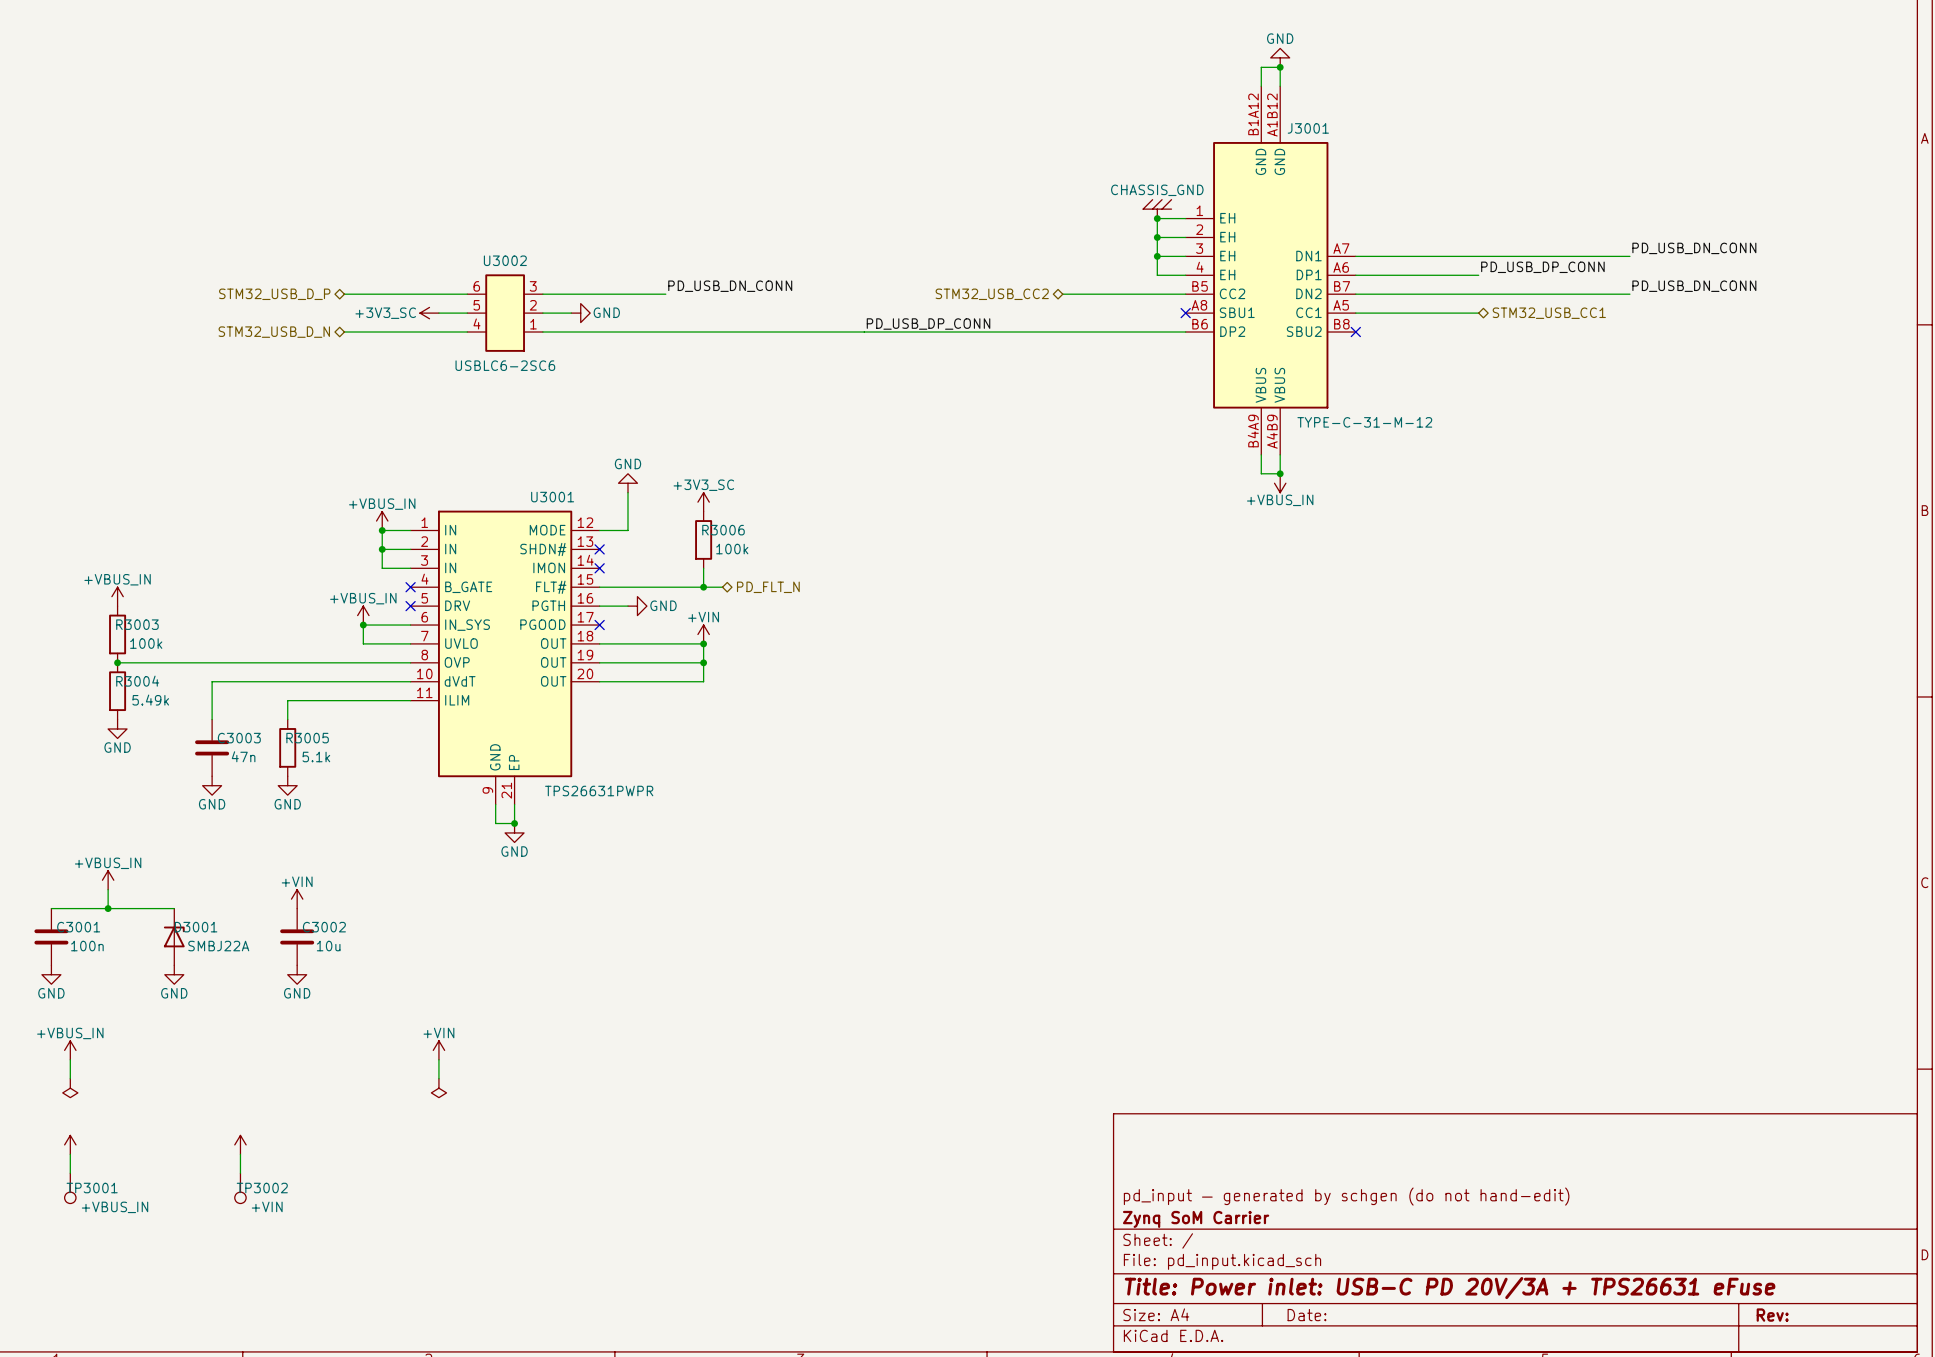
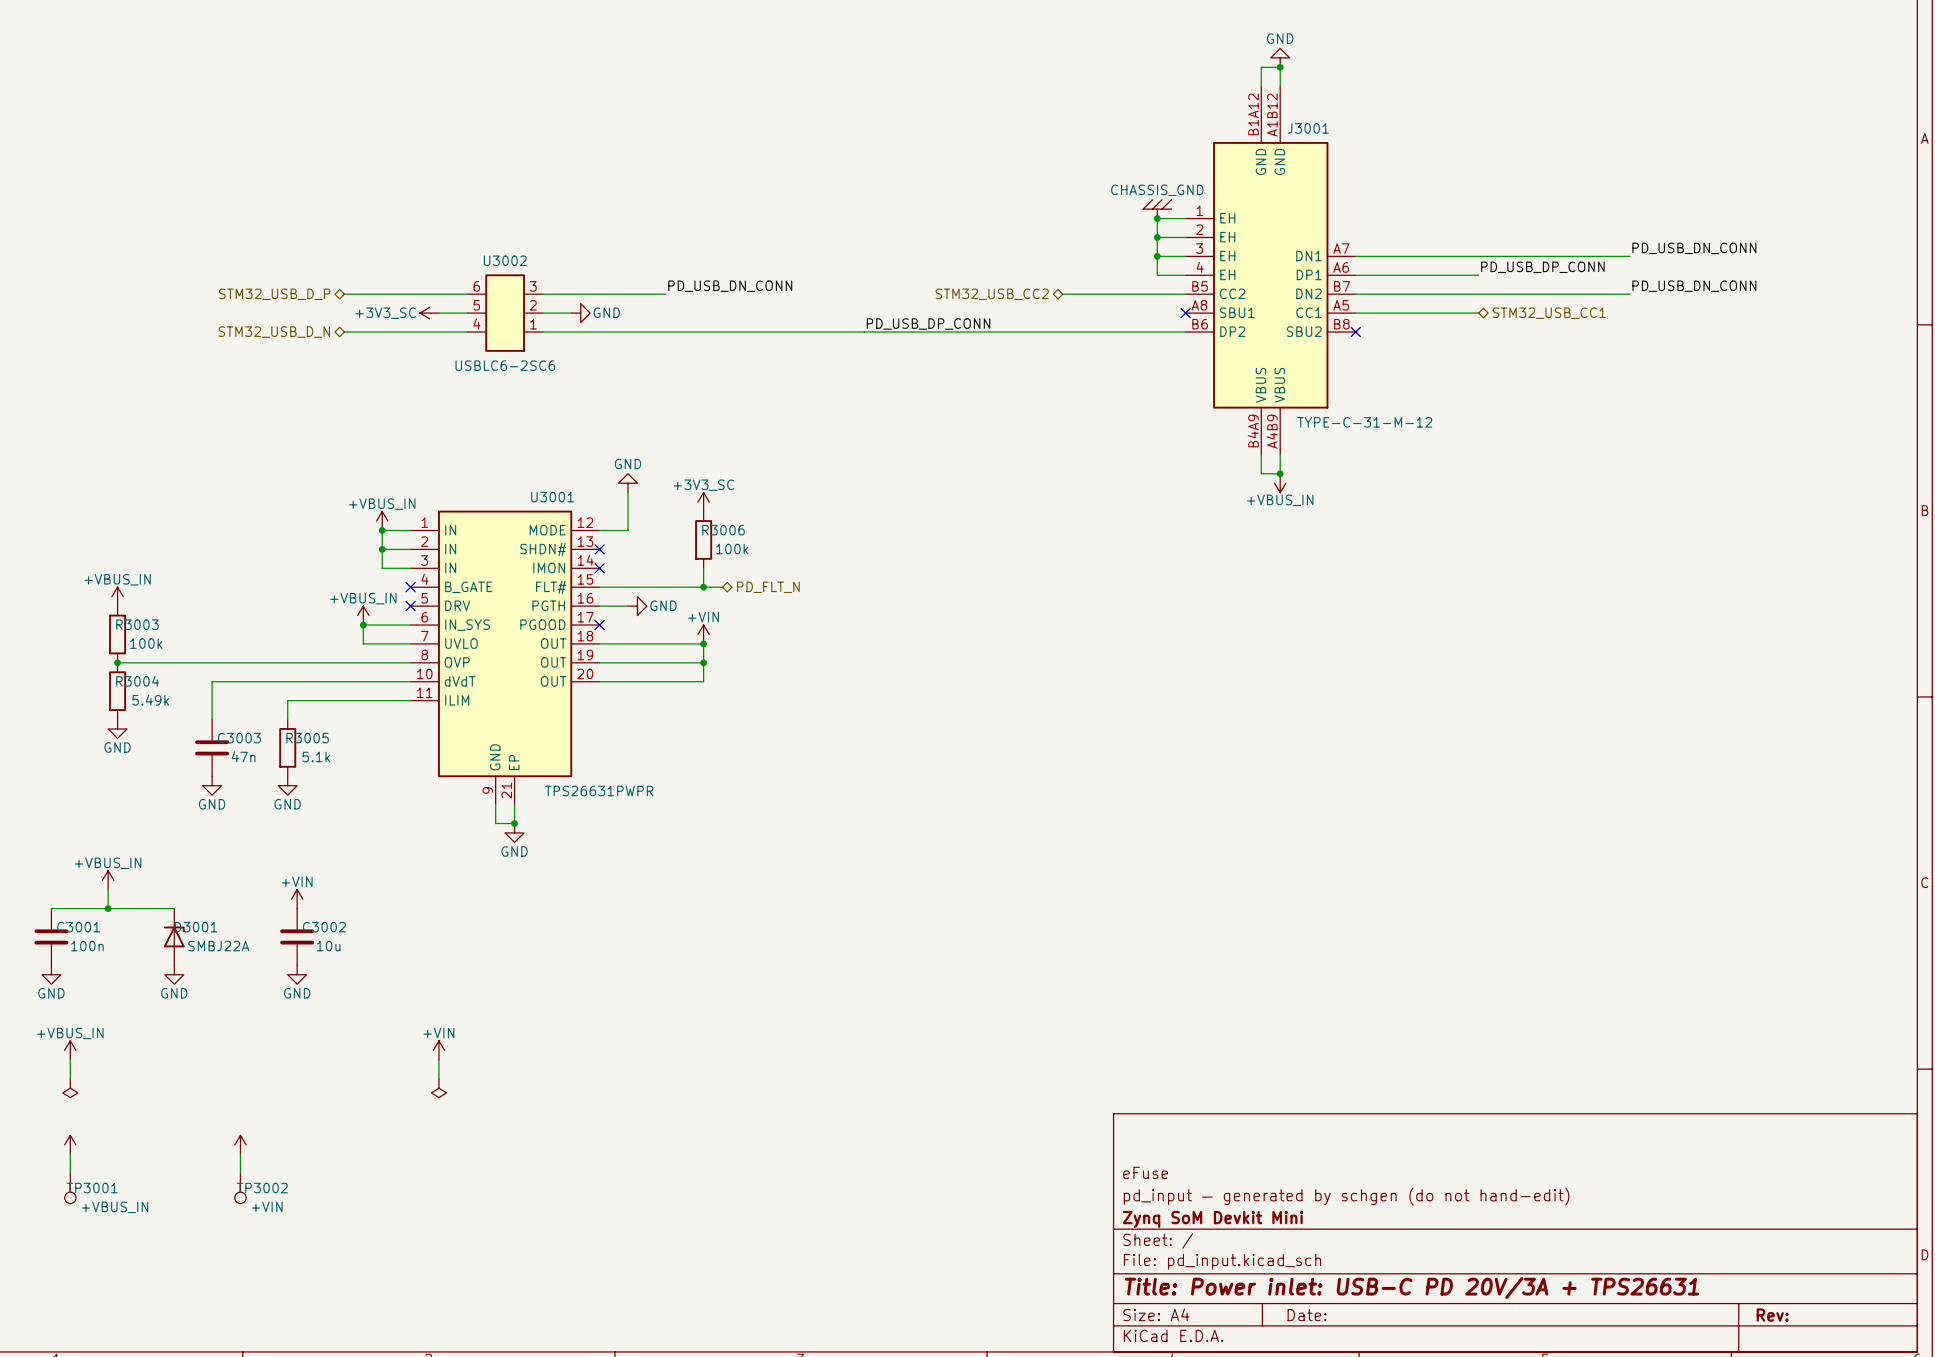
title block: none -> eFuse (1145, 1172)
title block: Zynq SoM Carrier (1196, 1219) -> Zynq SoM Devkit Mini (1213, 1219)
title block: Title: Power inlet: USB-C PD 20V/3A + TPS26631 eFuse (1450, 1288) -> Title: Power inlet: USB-C PD 20V/3A + TPS26631 (1412, 1288)

